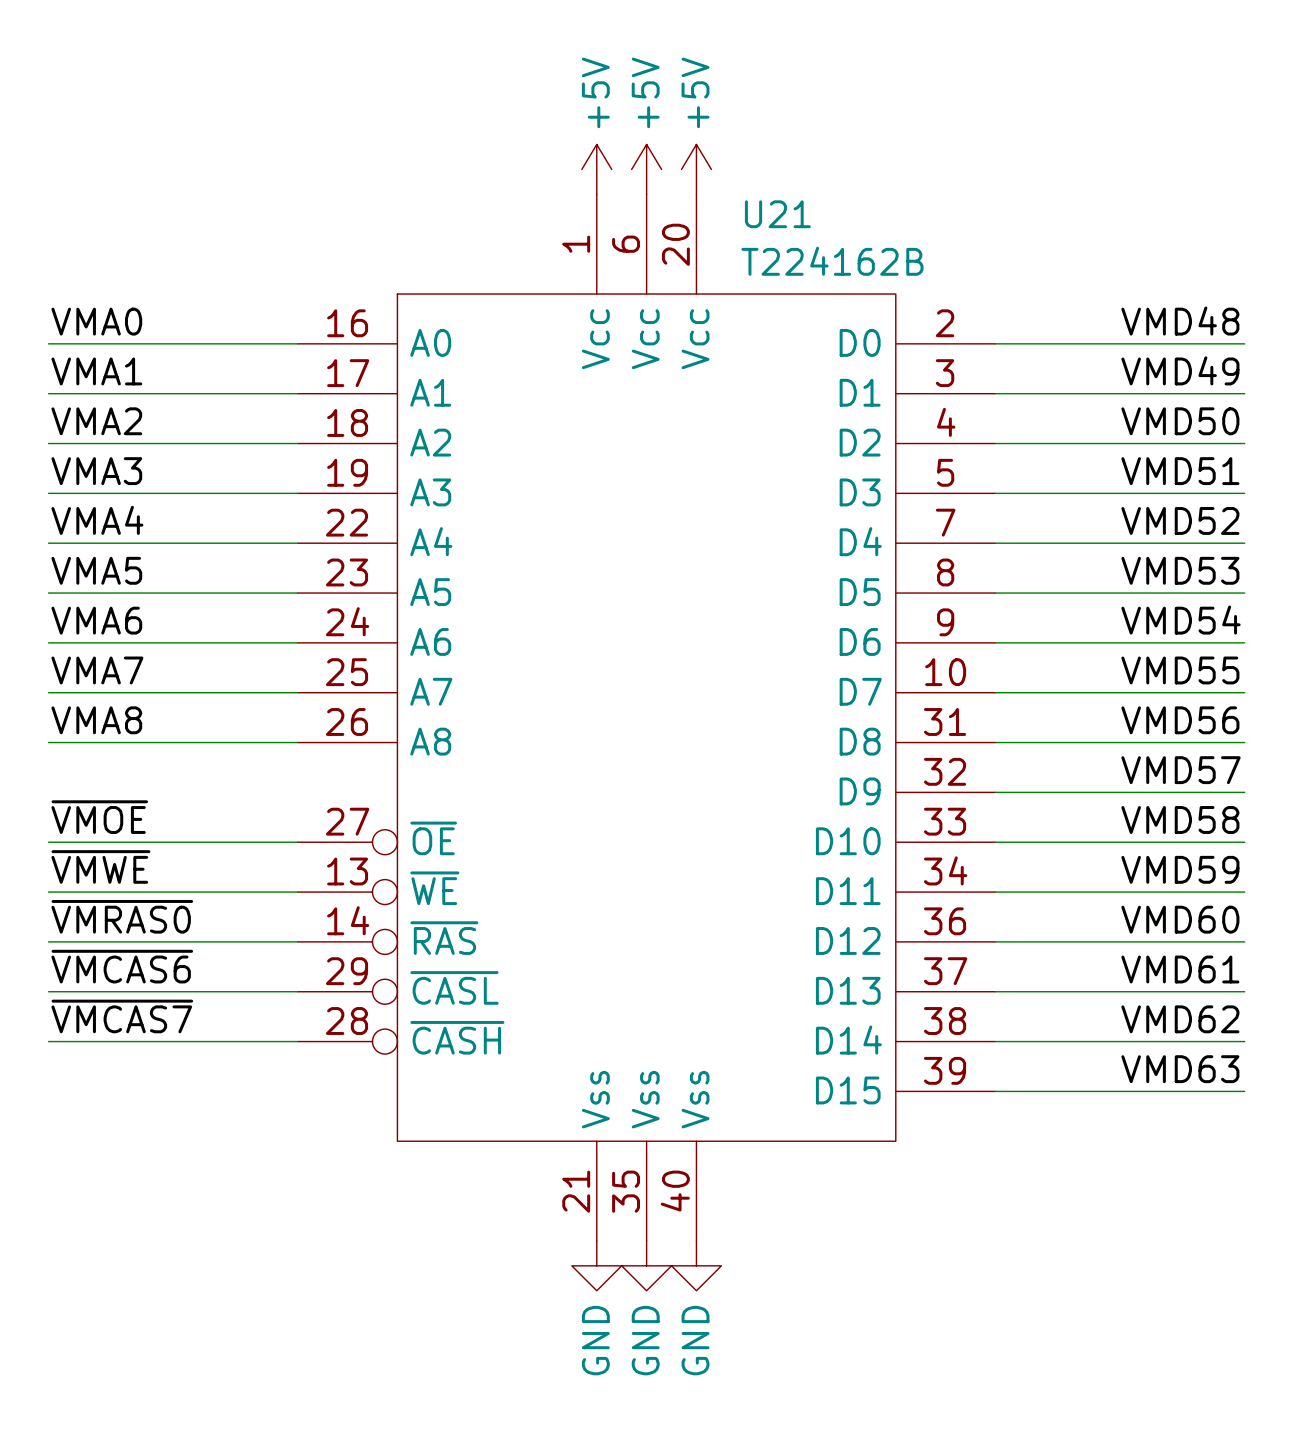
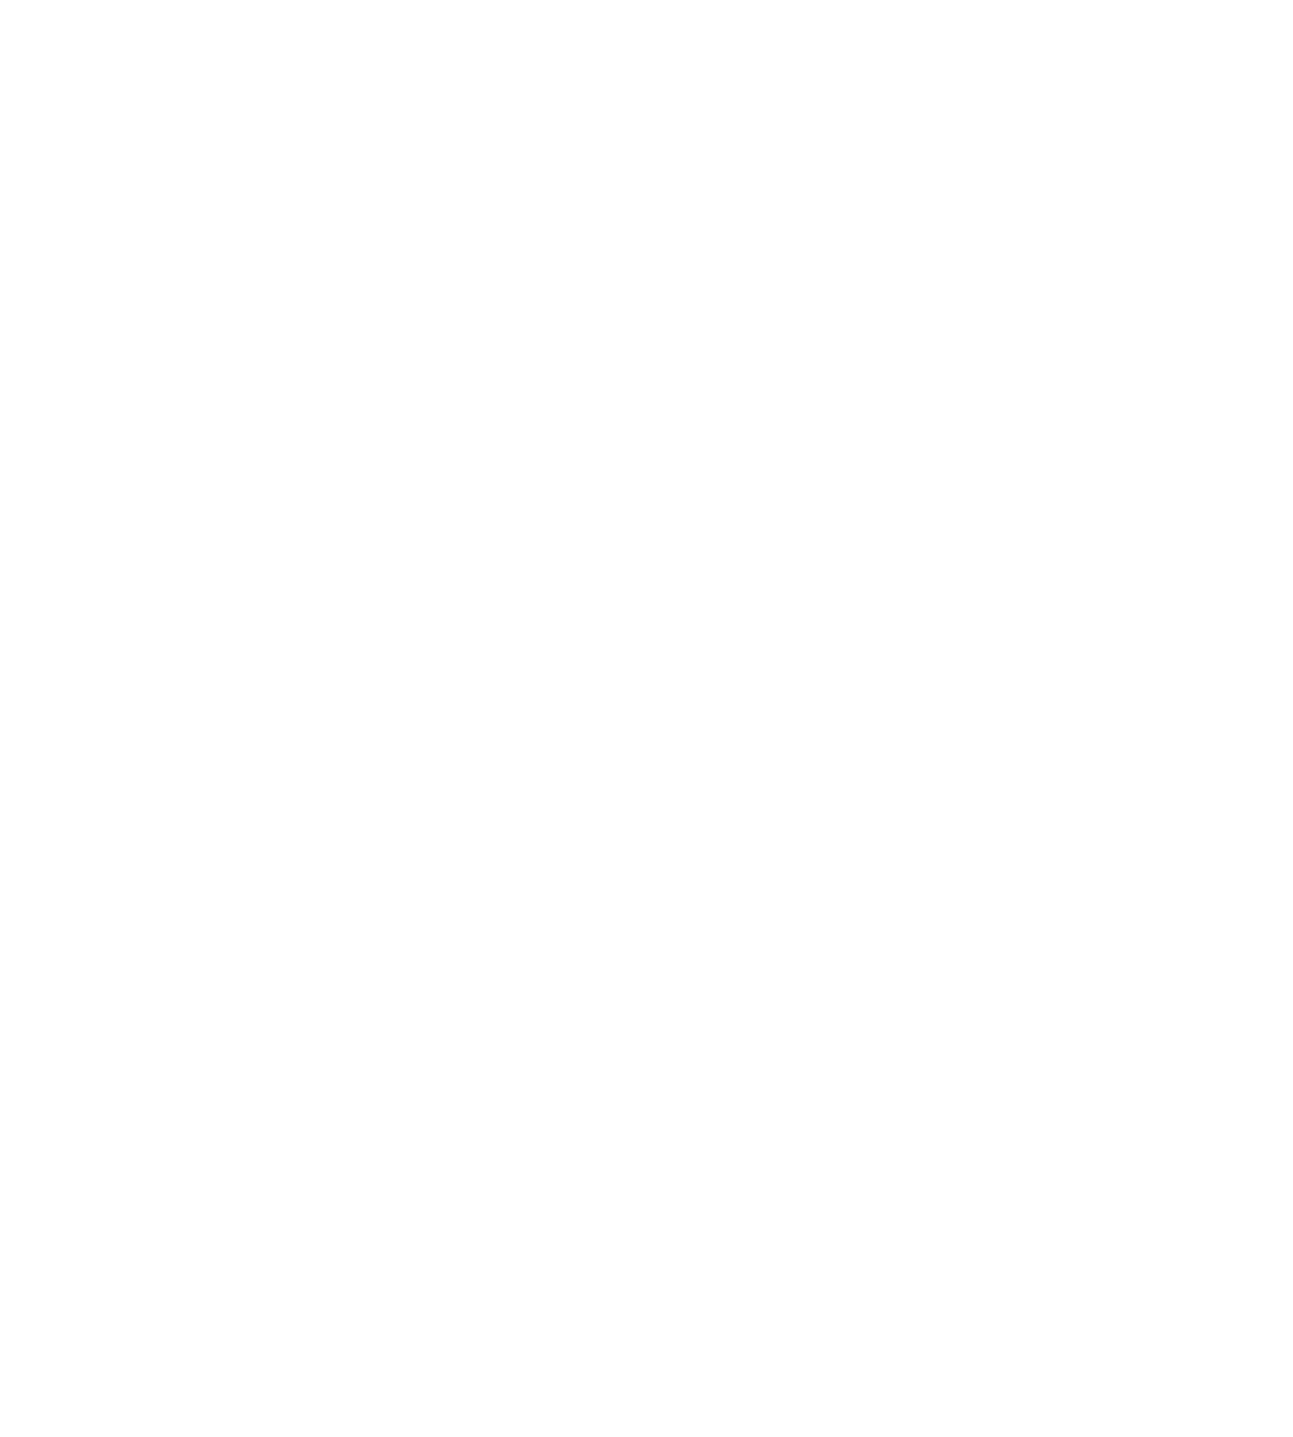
power symbol: +5V (596, 169) -> none
power symbol: +5V (646, 169) -> none
power symbol: +5V (696, 169) -> none
label: VMA0 (96, 321) -> none
label: VMD48 (1180, 321) -> none
wire: (48, 343) (297, 343) -> none
wire: (995, 343) (1244, 343) -> none
label: VMD49 (1180, 370) -> none
label: VMA1 (96, 371) -> none
wire: (48, 393) (297, 393) -> none
wire: (995, 393) (1244, 393) -> none
label: VMA2 (96, 421) -> none
label: VMD50 (1180, 421) -> none
wire: (48, 443) (297, 443) -> none
wire: (995, 443) (1244, 443) -> none
label: VMA3 (96, 471) -> none
label: VMD51 (1180, 471) -> none
wire: (48, 493) (297, 493) -> none
wire: (995, 493) (1244, 493) -> none
label: VMA4 (97, 520) -> none
label: VMD52 (1180, 520) -> none
wire: (48, 543) (297, 543) -> none
wire: (995, 543) (1244, 543) -> none
label: VMA5 (96, 570) -> none
label: VMD53 (1180, 570) -> none
wire: (48, 593) (297, 593) -> none
wire: (995, 593) (1244, 593) -> none
label: VMA6 (96, 620) -> none
label: VMD54 (1180, 620) -> none
wire: (48, 642) (297, 642) -> none
wire: (995, 642) (1244, 642) -> none
label: VMA7 (97, 670) -> none
label: VMD55 (1180, 670) -> none
wire: (48, 692) (297, 692) -> none
wire: (995, 692) (1244, 692) -> none
U21: T224162B (646, 717) -> none
label: VMA8 (96, 720) -> none
label: VMD56 (1180, 720) -> none
wire: (48, 742) (297, 742) -> none
wire: (995, 742) (1244, 742) -> none
label: VMD57 (1180, 770) -> none
wire: (995, 792) (1244, 792) -> none
label: ~{VMOE} (99, 817) -> none
label: VMD58 (1180, 819) -> none
wire: (48, 842) (297, 842) -> none
wire: (995, 842) (1244, 842) -> none
label: ~{VMWE} (100, 866) -> none
label: VMD59 (1180, 869) -> none
wire: (48, 892) (297, 892) -> none
wire: (995, 892) (1244, 892) -> none
label: ~{VMRAS0} (122, 916) -> none
label: VMD60 (1180, 919) -> none
wire: (48, 941) (297, 941) -> none
wire: (995, 941) (1244, 941) -> none
label: ~{VMCAS6} (122, 966) -> none
label: VMD61 (1180, 969) -> none
wire: (48, 991) (297, 991) -> none
wire: (995, 991) (1244, 991) -> none
label: ~{VMCAS7} (122, 1016) -> none
label: VMD62 (1180, 1019) -> none
wire: (48, 1041) (297, 1041) -> none
wire: (995, 1041) (1244, 1041) -> none
label: VMD63 (1180, 1069) -> none
wire: (995, 1091) (1244, 1091) -> none
power symbol: GND (596, 1265) -> none
power symbol: GND (646, 1265) -> none
power symbol: GND (696, 1265) -> none

